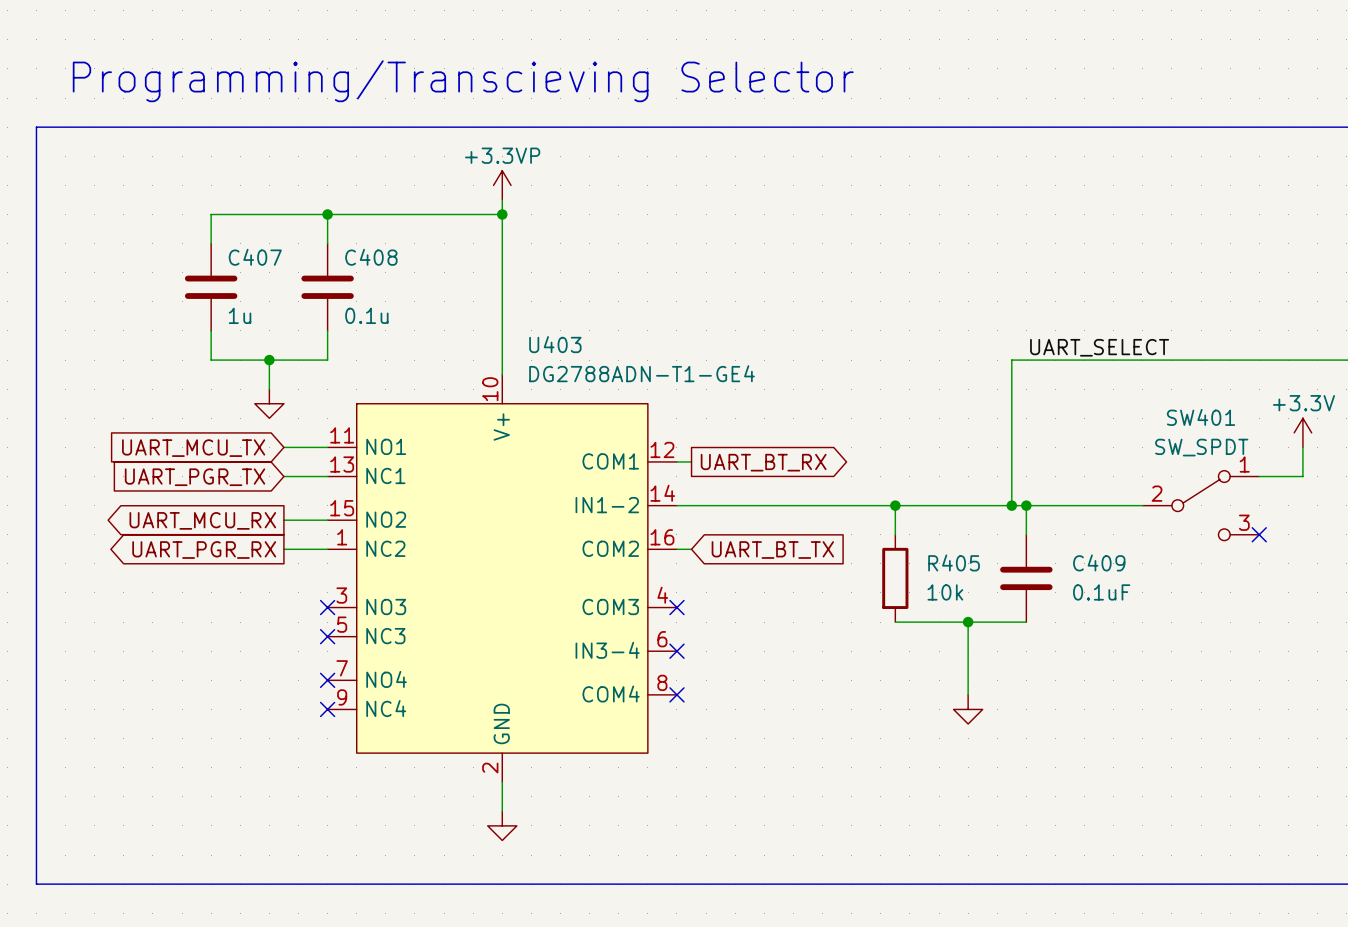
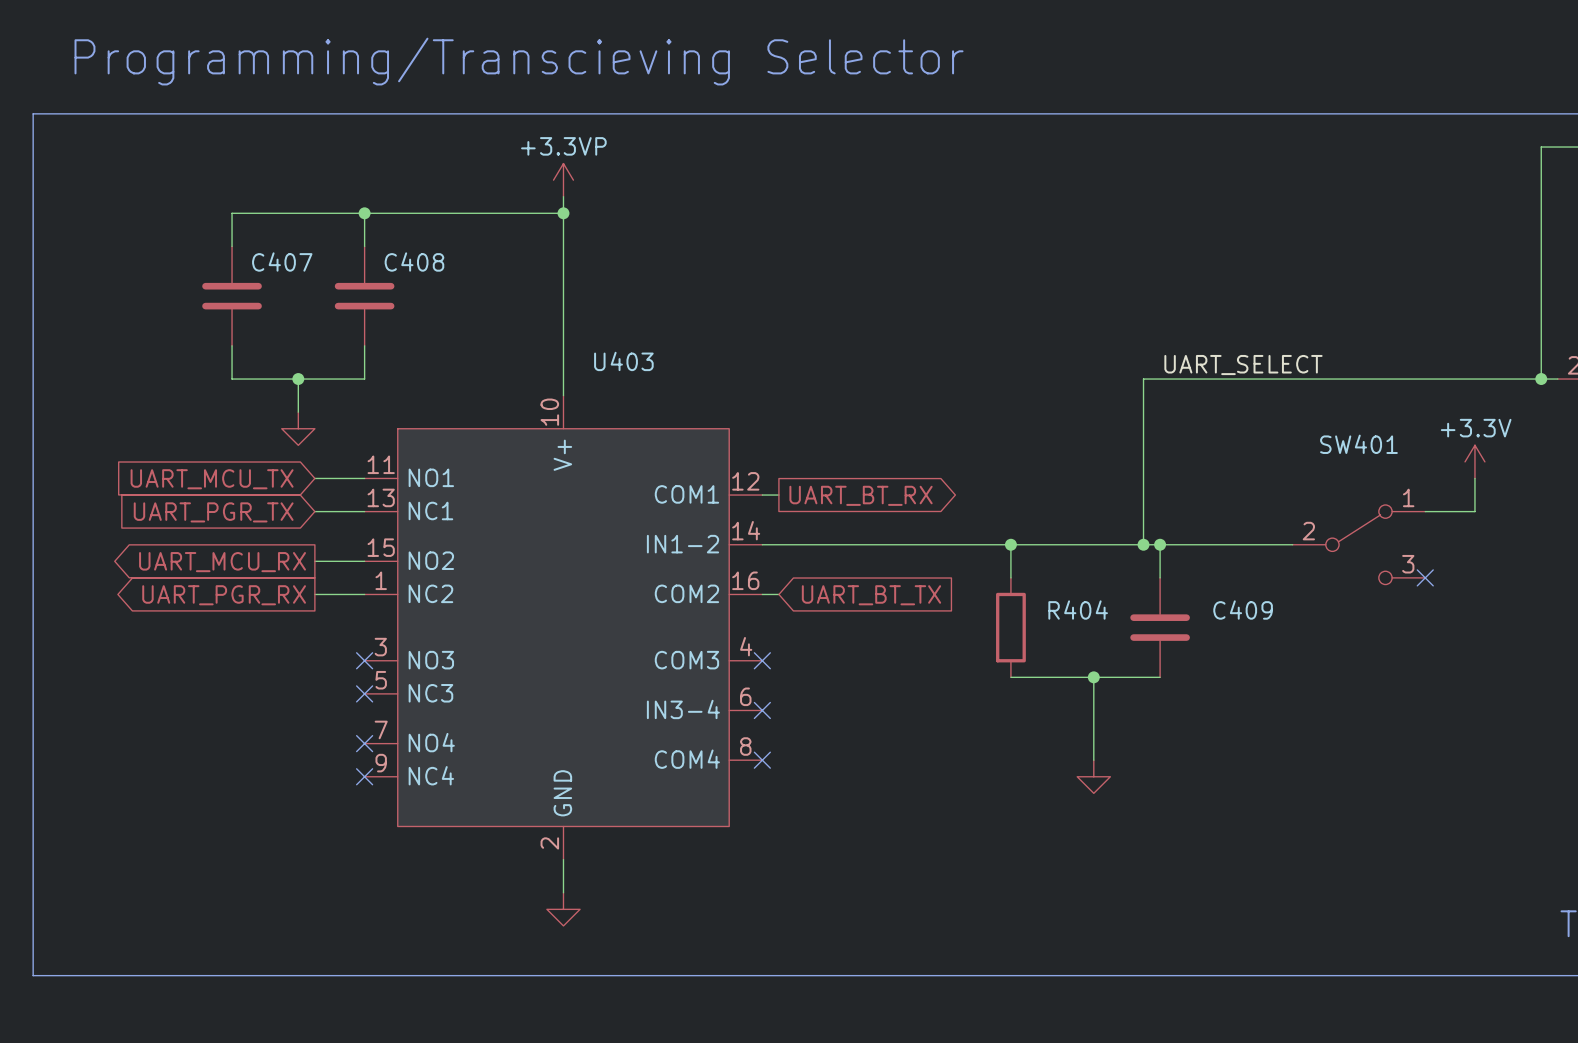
C407 value: 1u (240, 315) -> none
C408 value: 0.1u (366, 315) -> none
U403 value: DG2788ADN-T1-GE4 (642, 373) -> none
SW401 value: SW_SPDT (1201, 447) -> none
R405 name: R405 (954, 562) -> R404 (1078, 610)
R405 value: 10k (945, 592) -> none
C409 value: 0.1uF (1101, 592) -> none

